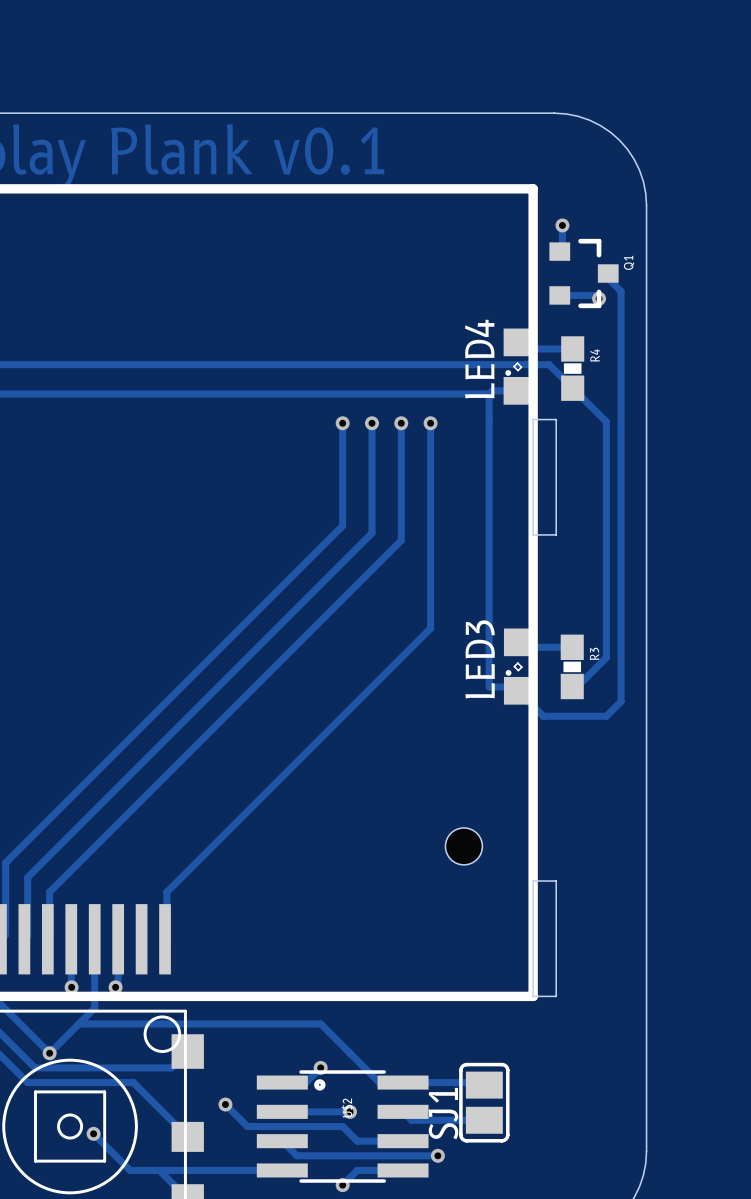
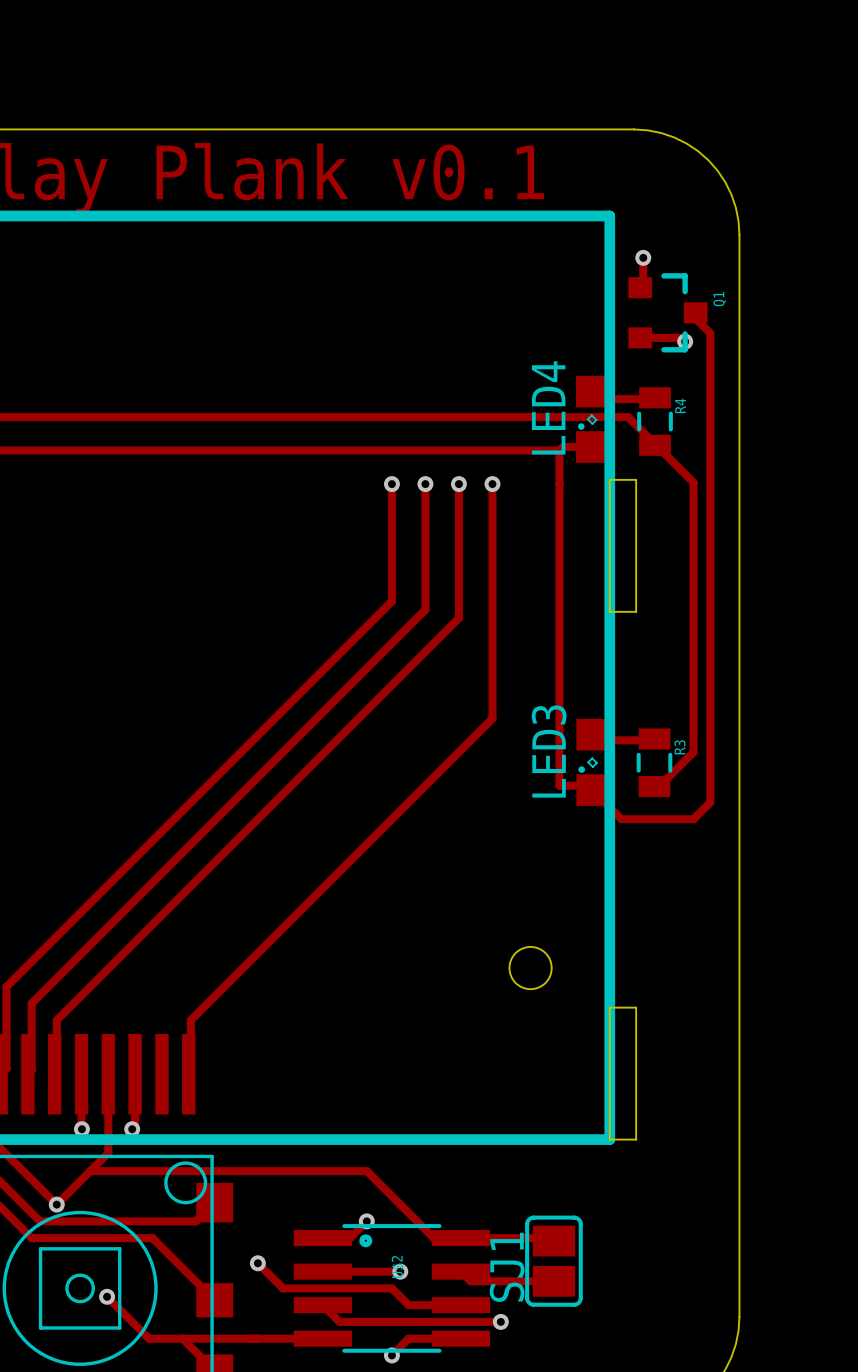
R4 footprint: [561, 336, 585, 401] -> [637, 387, 673, 456]
R3 footprint: [560, 634, 584, 700] -> [636, 728, 673, 798]

